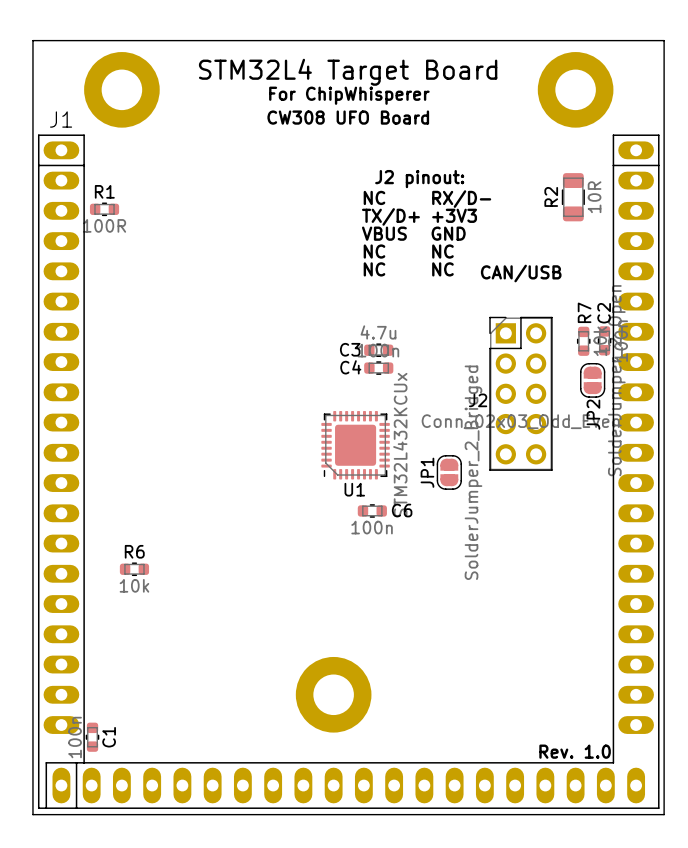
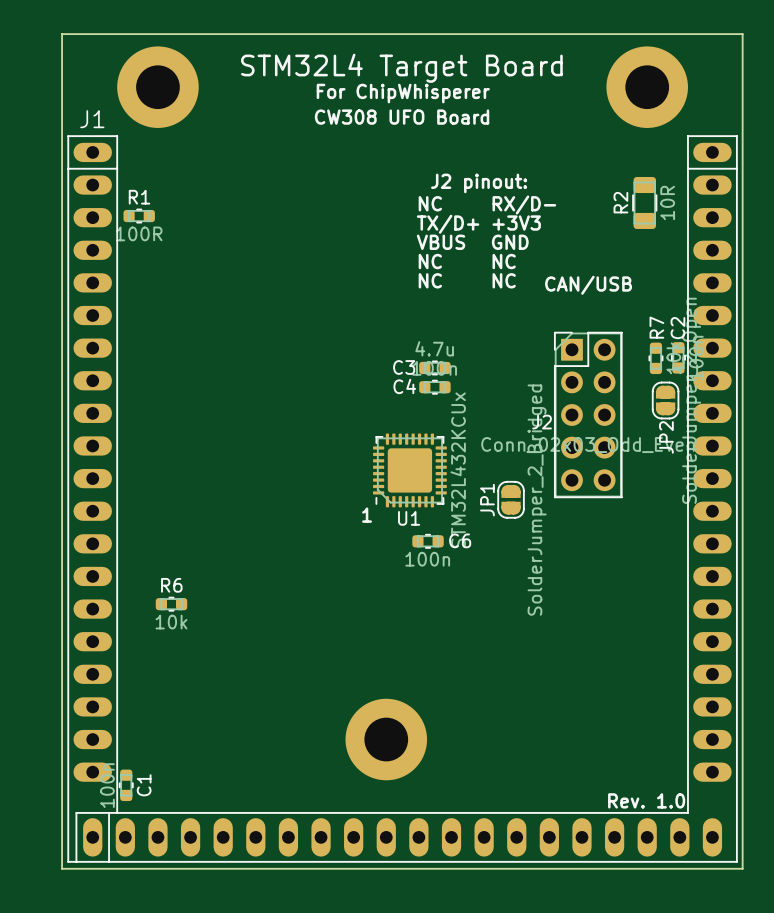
text: none -> 1 (367, 515)

